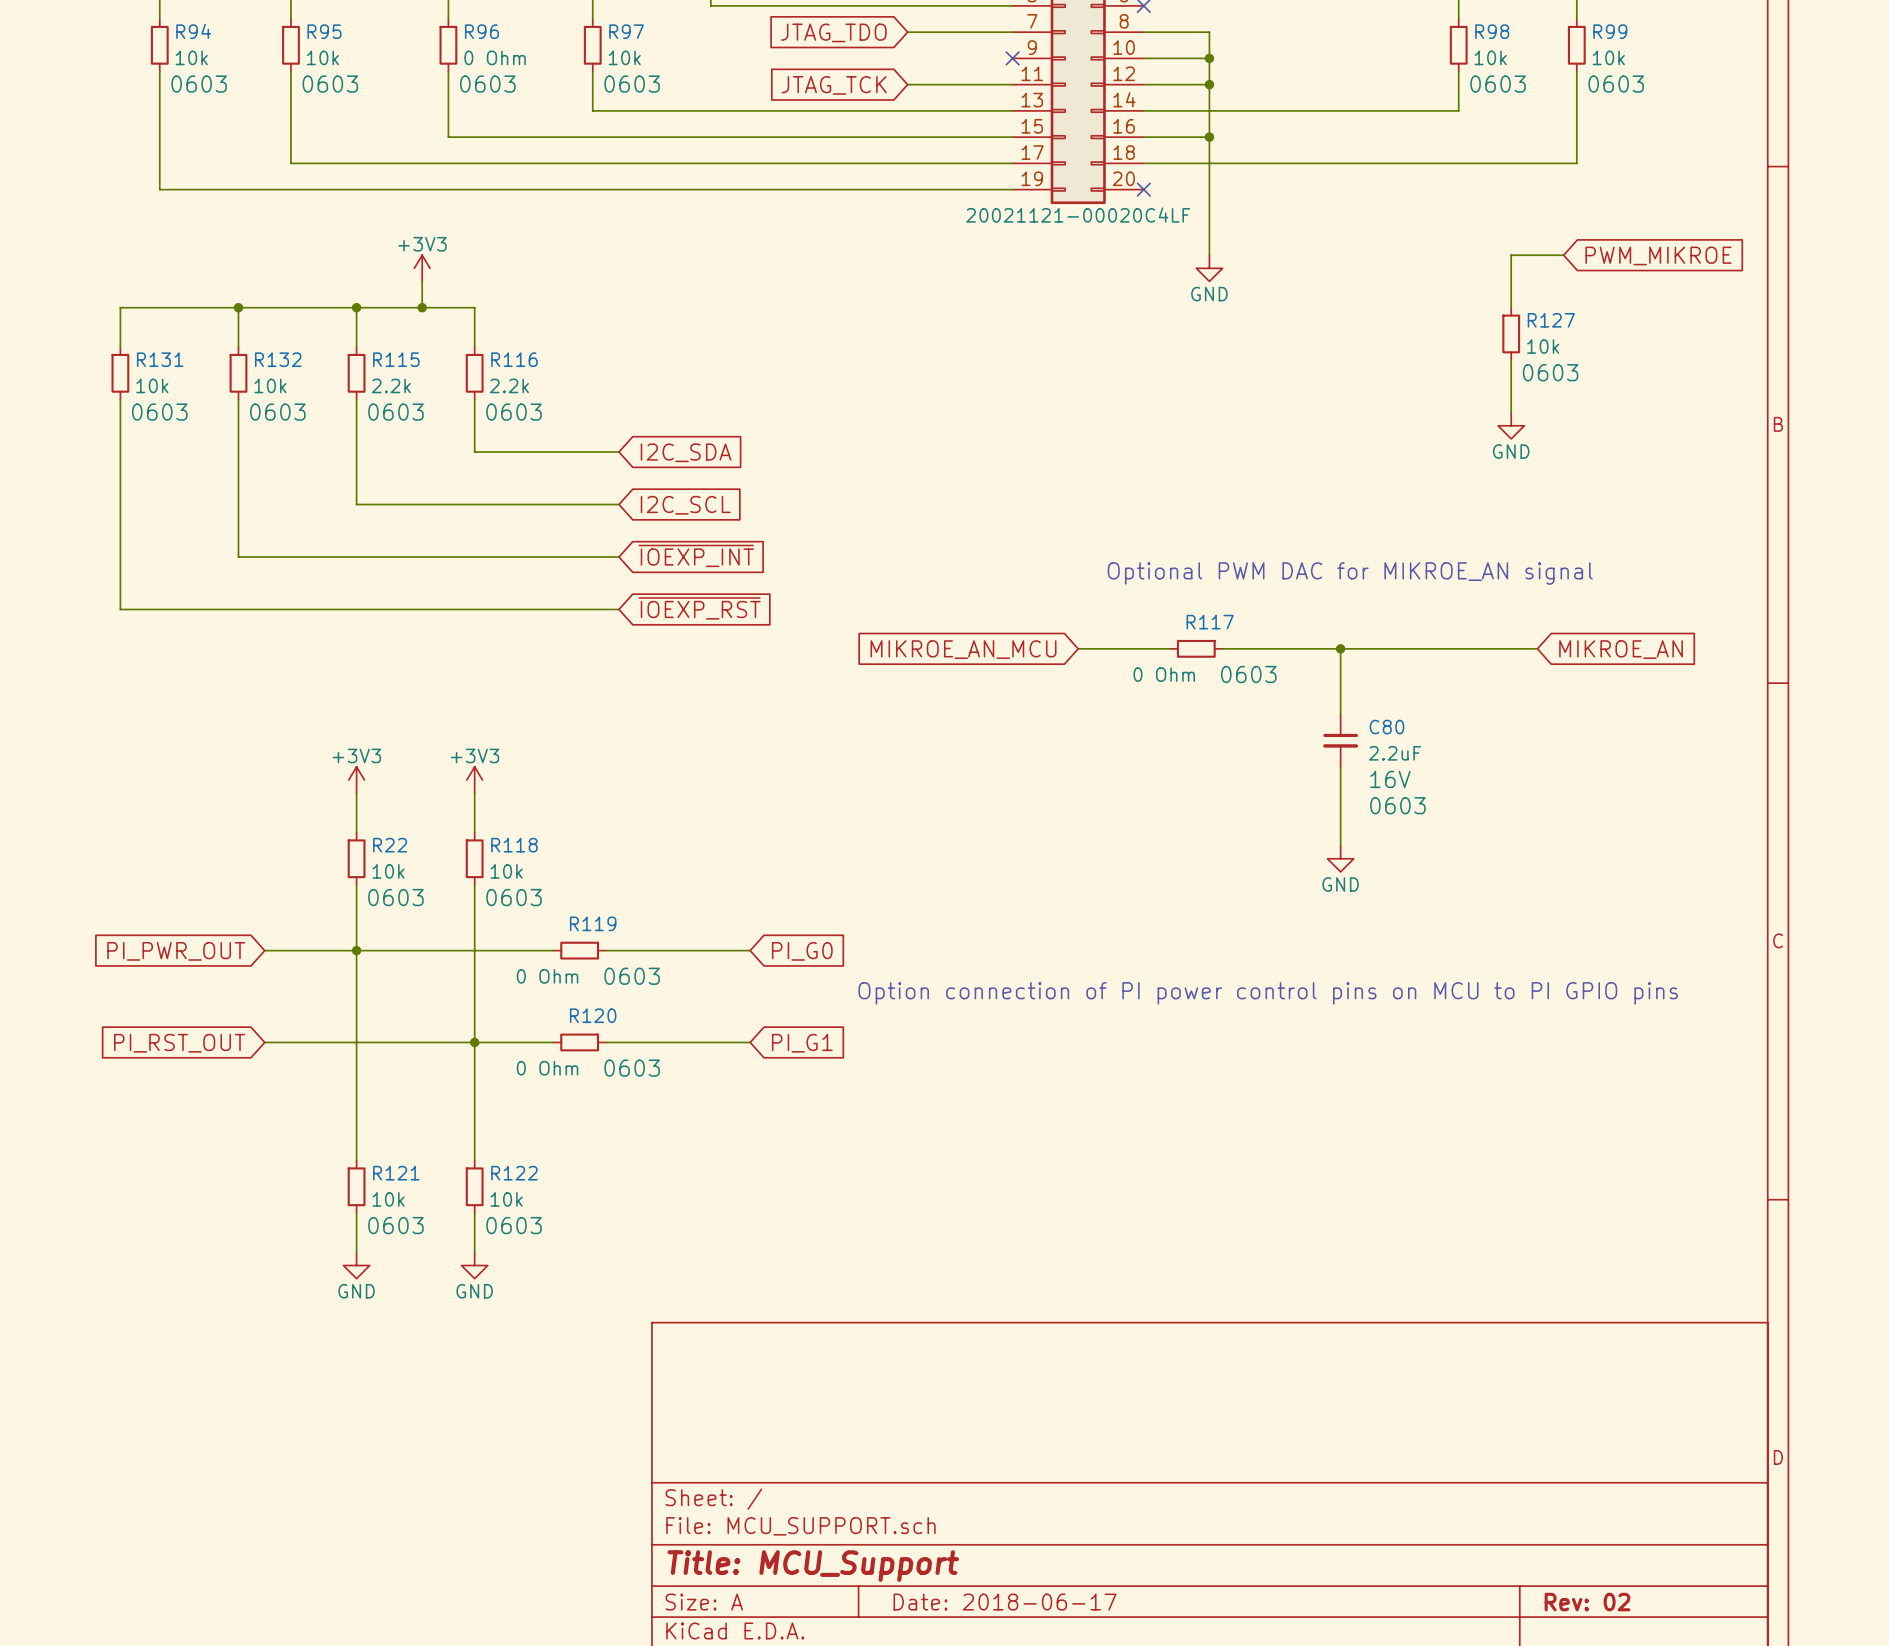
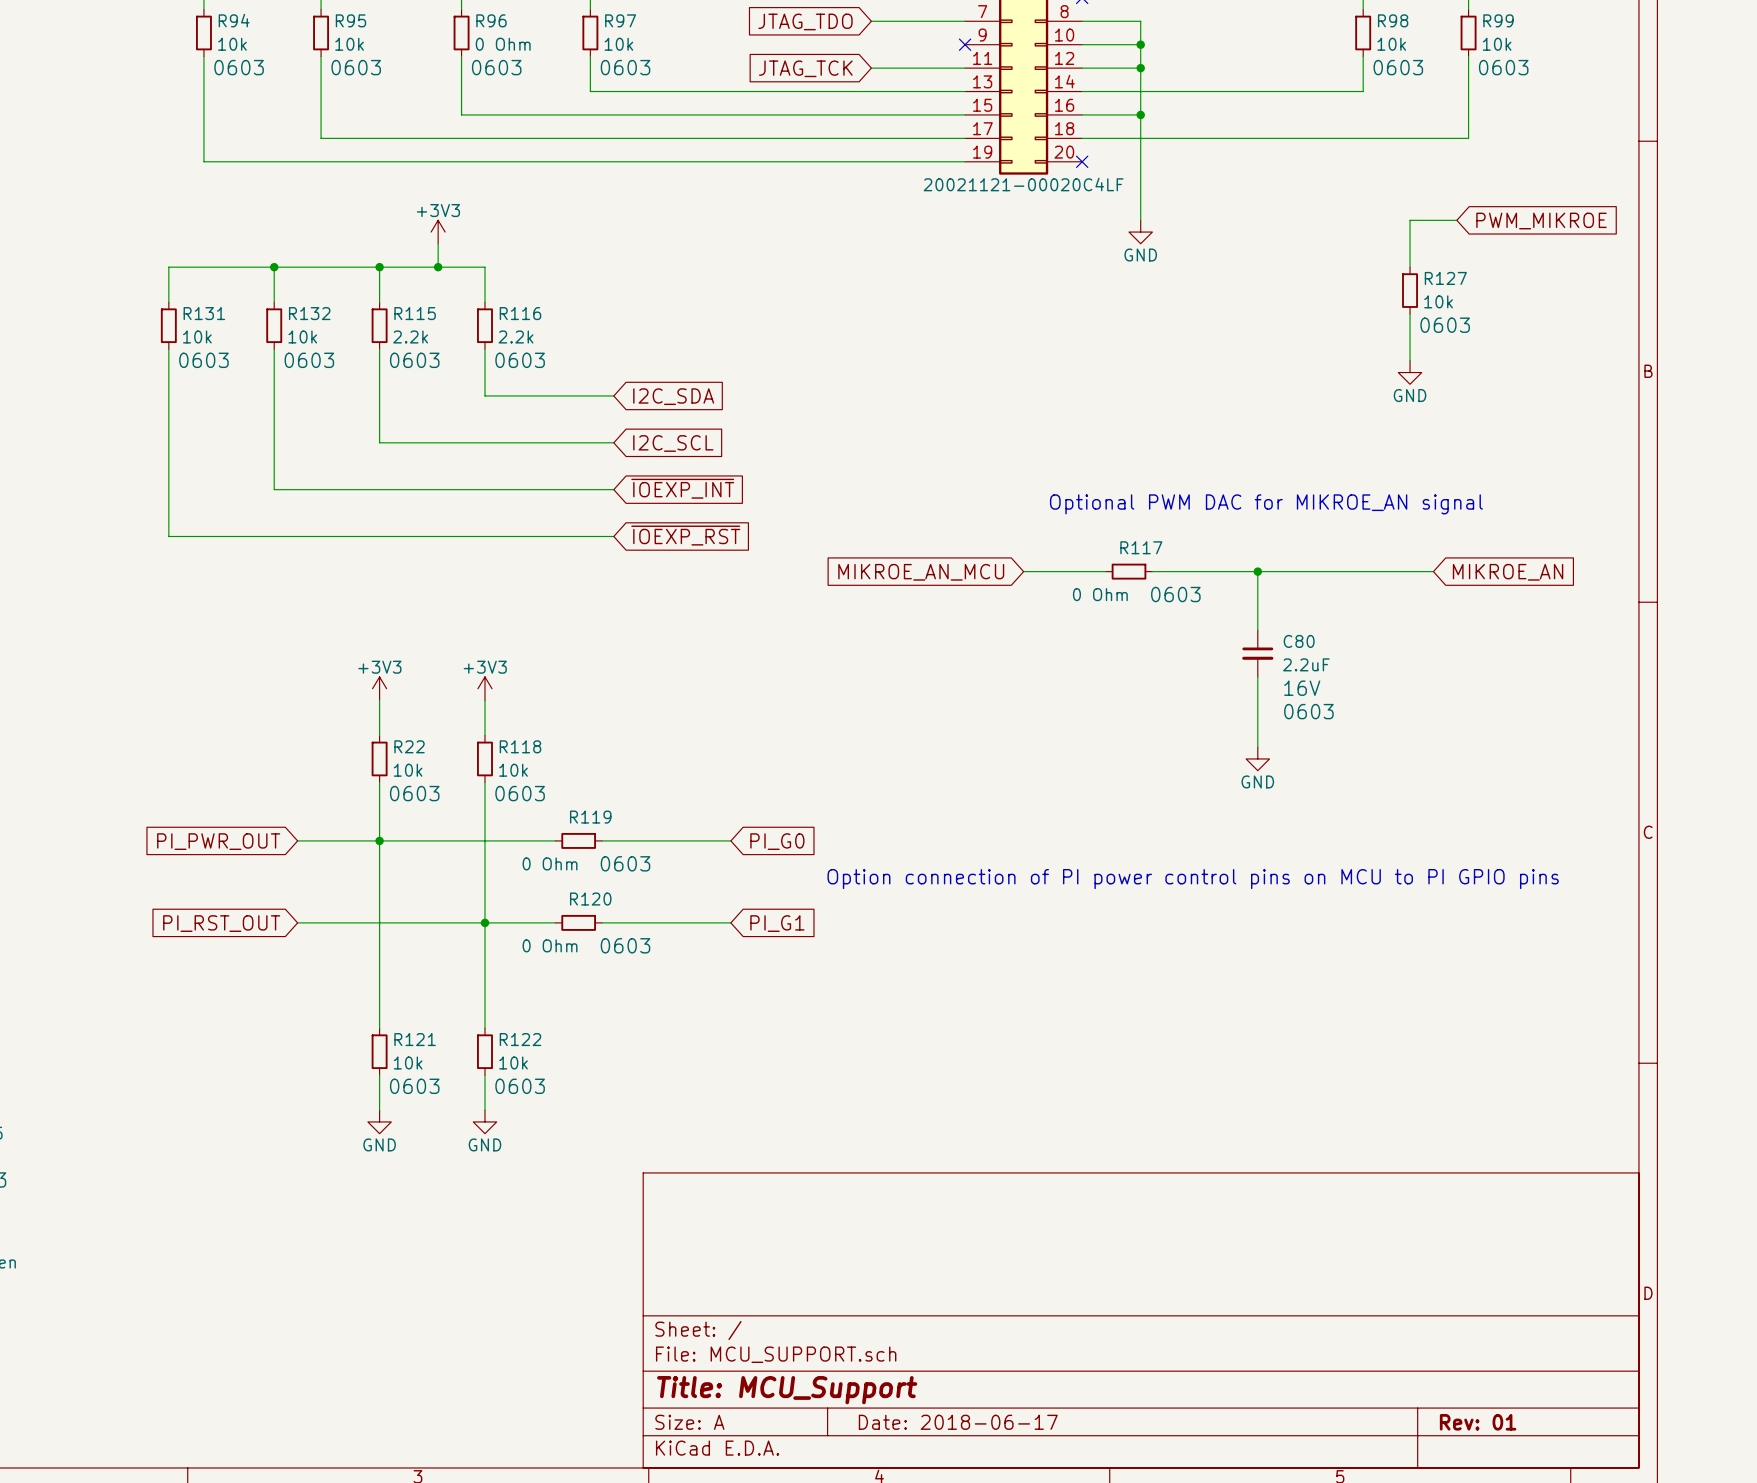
title block: Rev: 02 (1587, 1602) -> Rev: 01 (1478, 1422)

